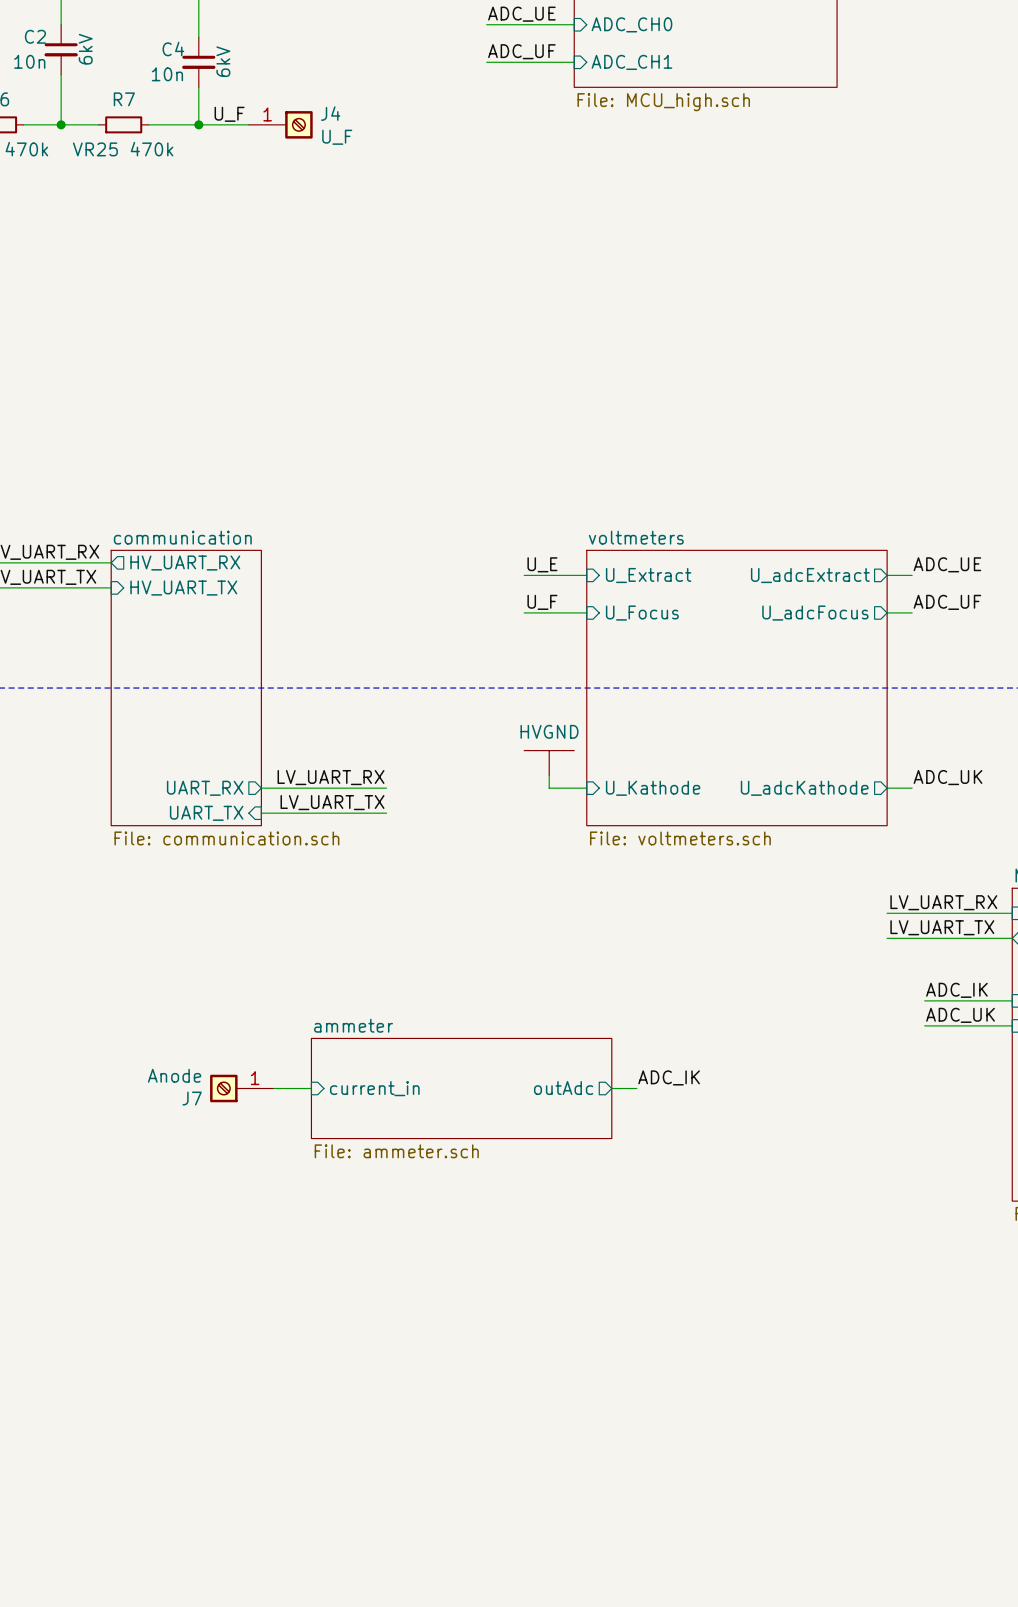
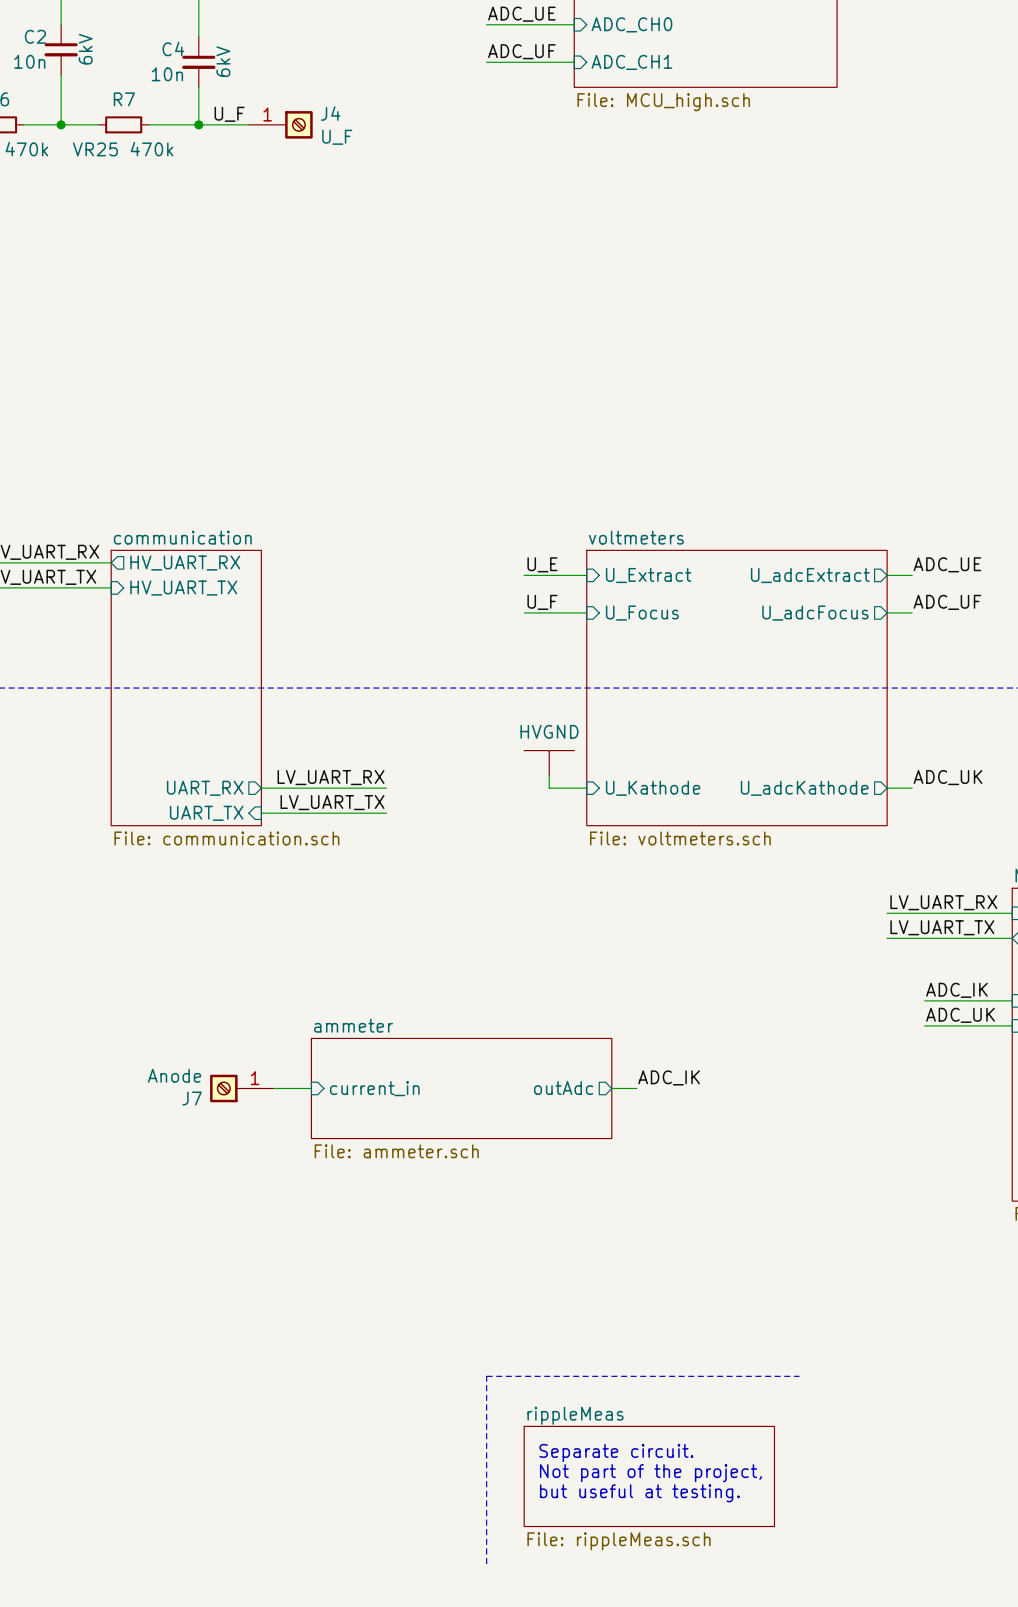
line: none -> (799, 1376) (486, 1376) (486, 1564)
text: none -> Separate circuit. (616, 1453)
text: none -> Not part of the project, (650, 1473)
sheet rippleMeas: none -> File: rippleMeas.sch (649, 1476)
text: none -> but useful at testing. (639, 1493)

